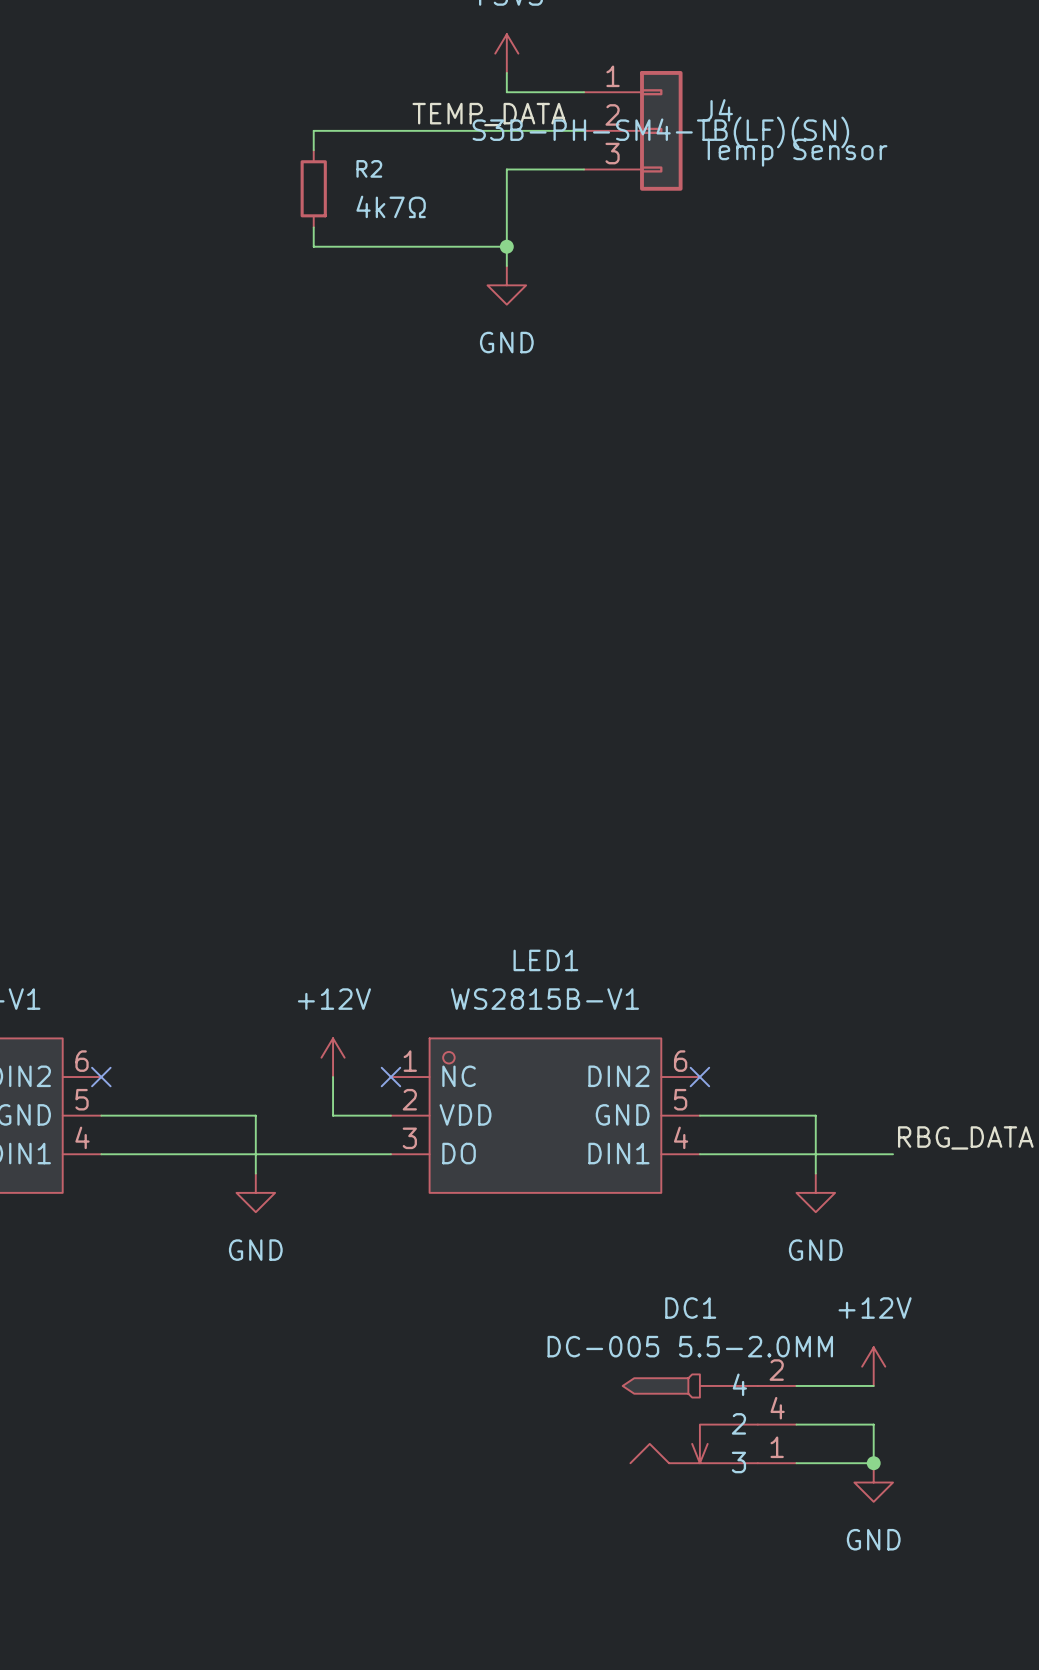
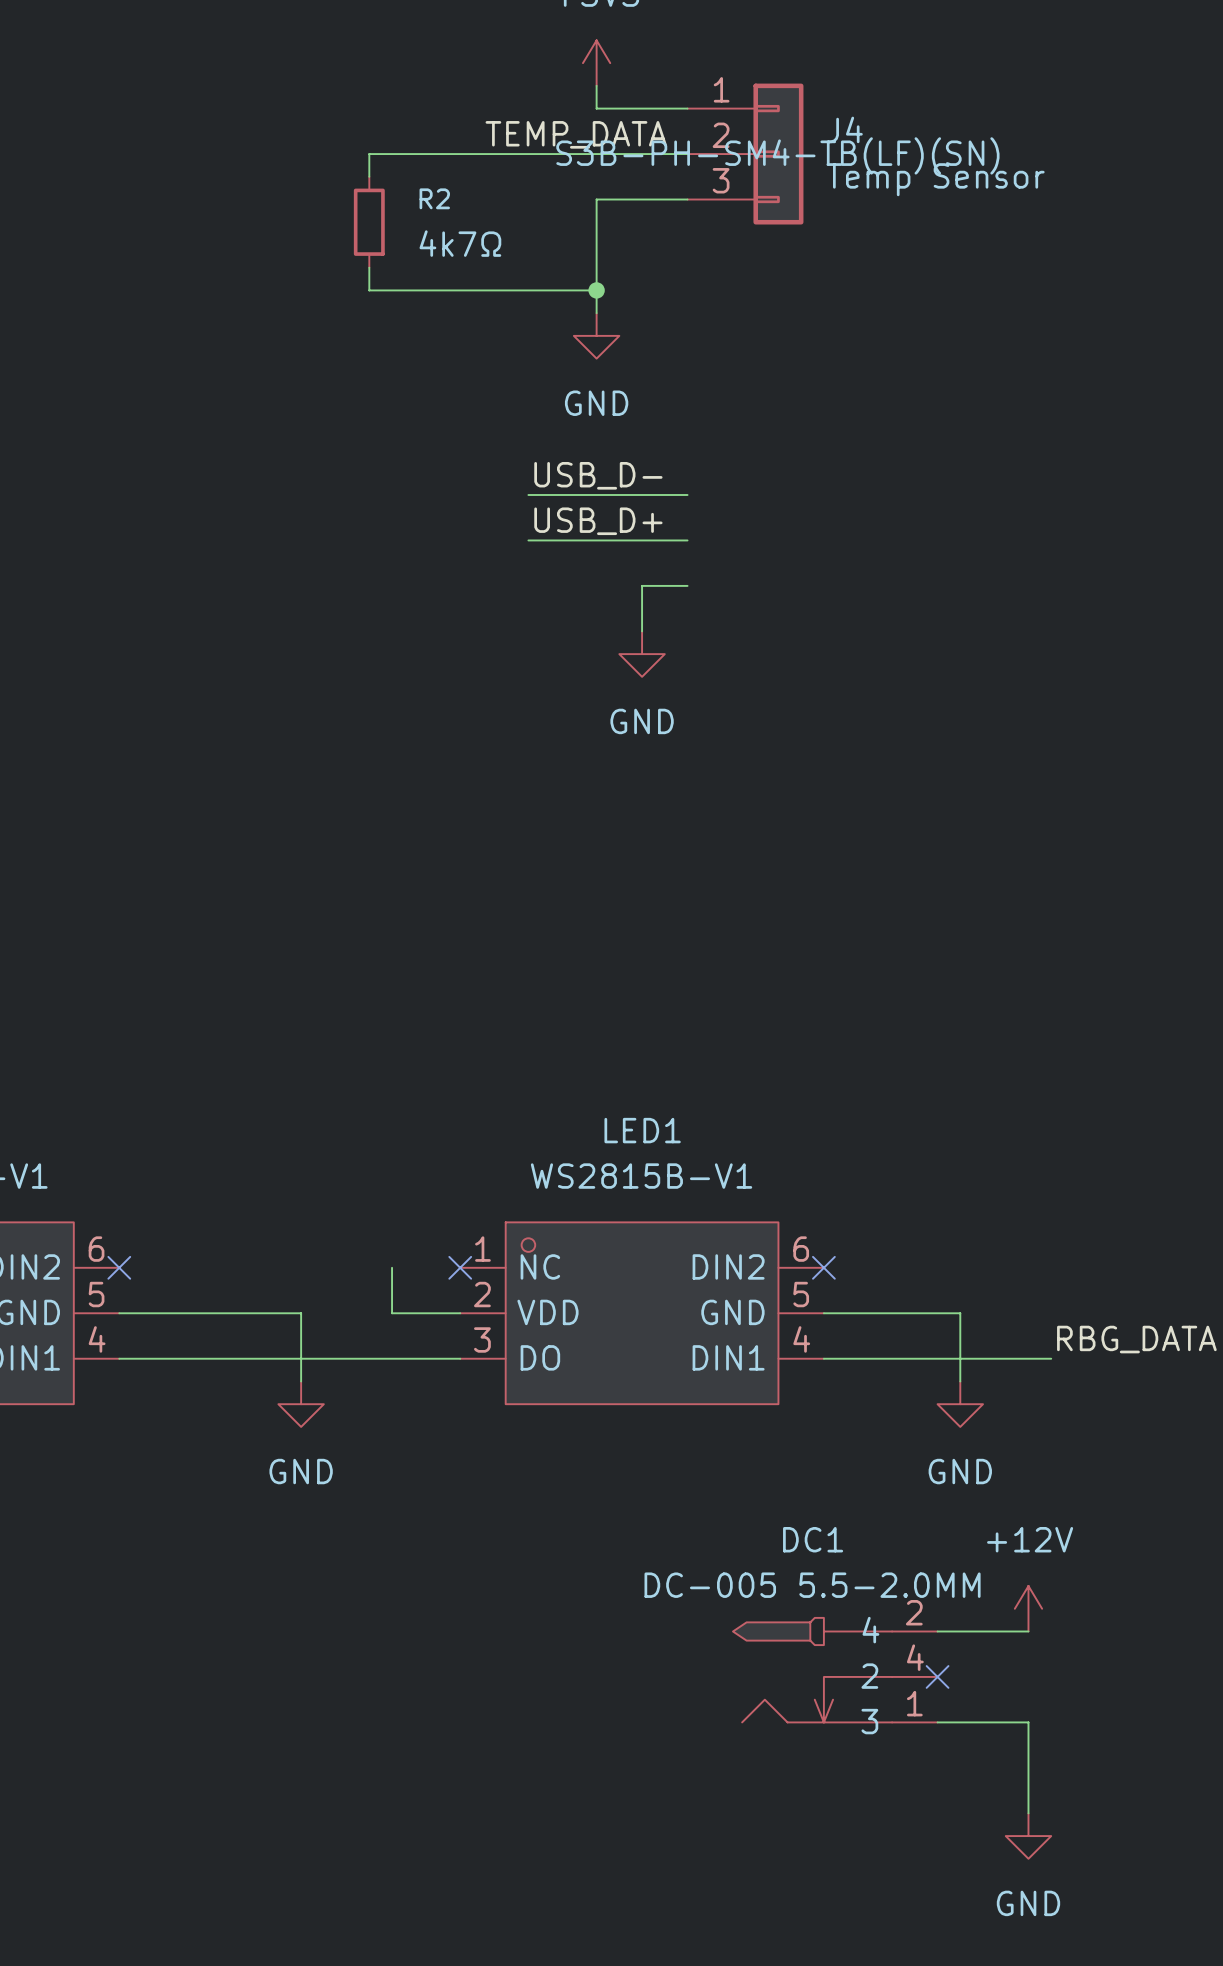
label: none -> USB_D- (598, 475)
wire: none -> (528, 494) (687, 494)
label: none -> USB_D+ (598, 521)
wire: none -> (528, 540) (687, 540)
wire: none -> (687, 585) (642, 585) (642, 631)
power symbol: none -> GND (642, 654)
power symbol: +12V (333, 1057) -> none
wire: (796, 1424) (873, 1424) (873, 1463) -> (1028, 1813) (1028, 1722)
no-connect mark: none -> (937, 1676)
junction: (873, 1463) -> none
power symbol position: GND (873, 1482) -> GND (1028, 1836)

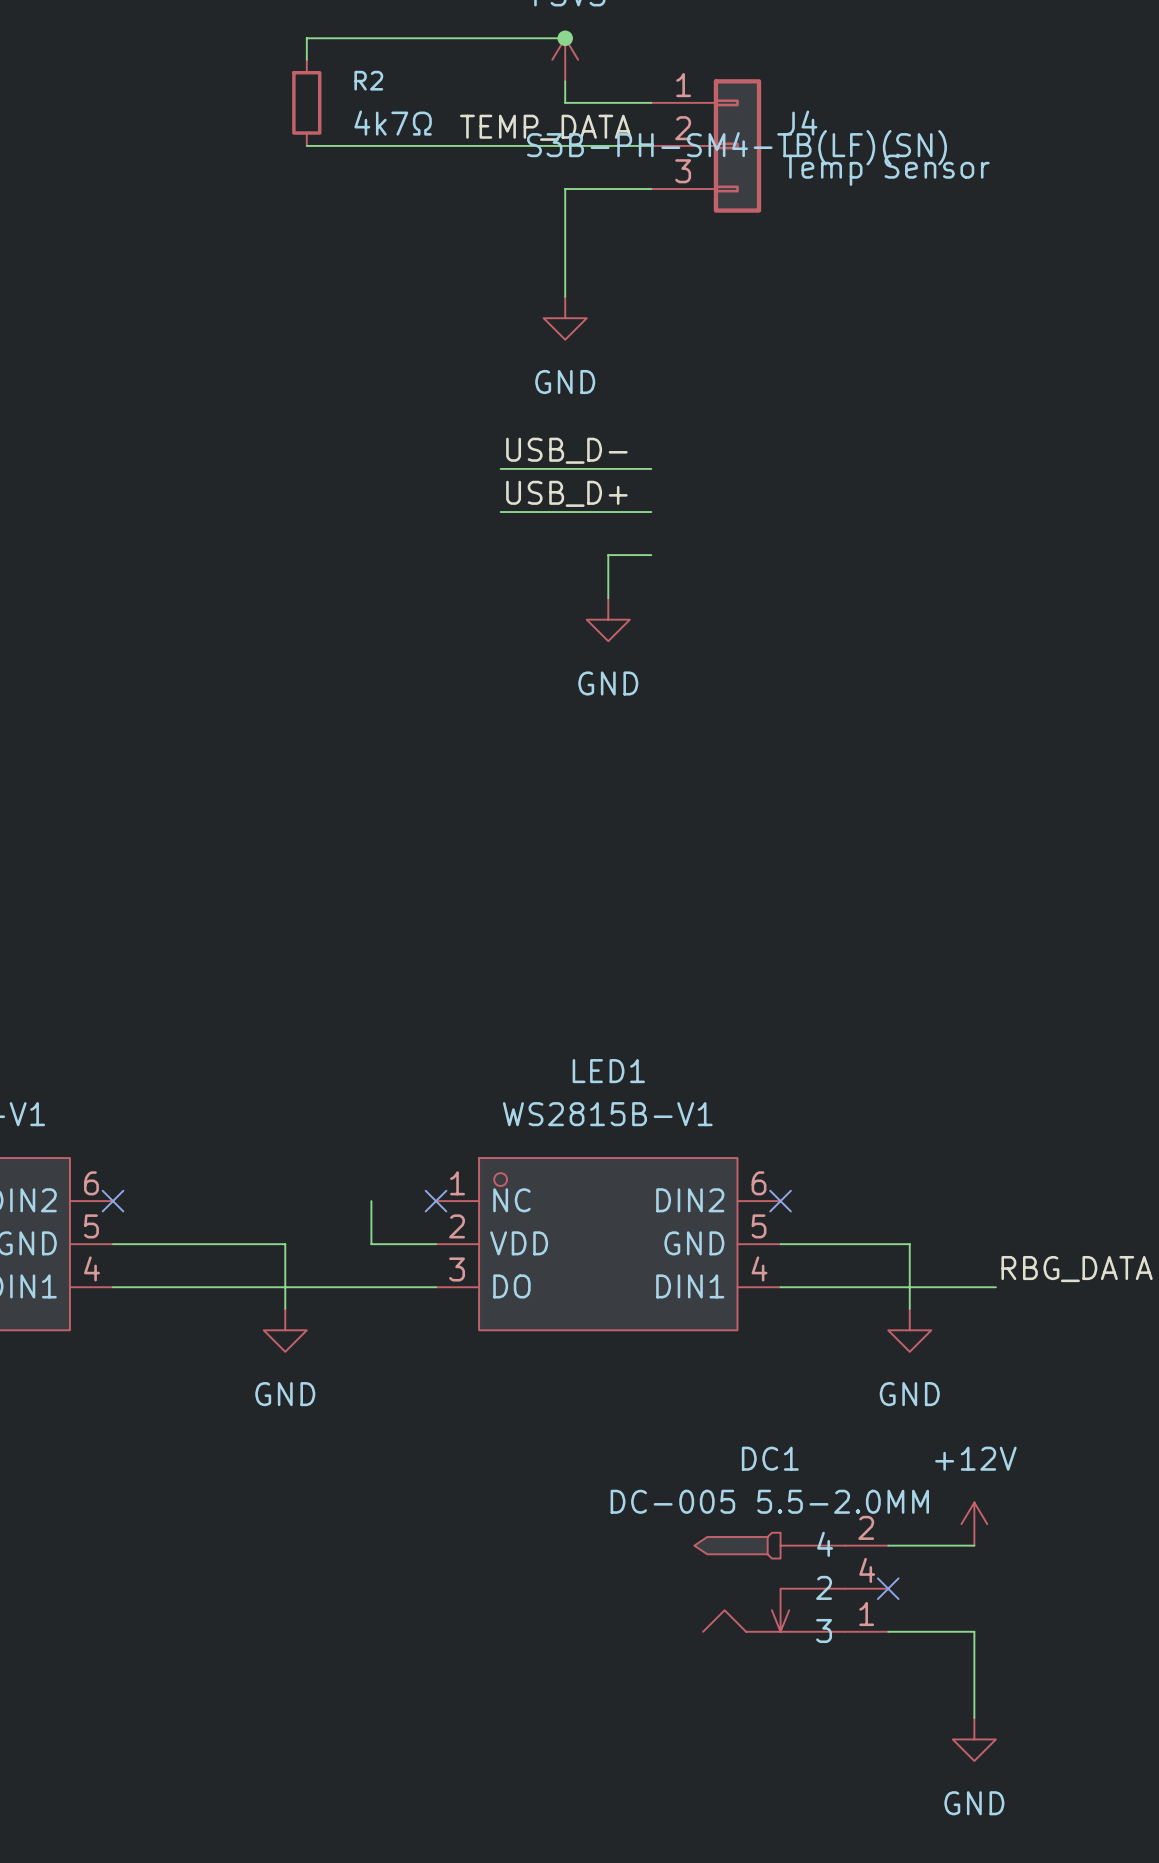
wire: none -> (565, 38) (306, 38) (306, 59)
junction: none -> (565, 38)
wire: (369, 154) (369, 176) -> (349, 145) (306, 145)
R2 position: (369, 222) -> (306, 102)
wire: (369, 267) (369, 290) (596, 290) -> none
junction: (596, 290) -> none

